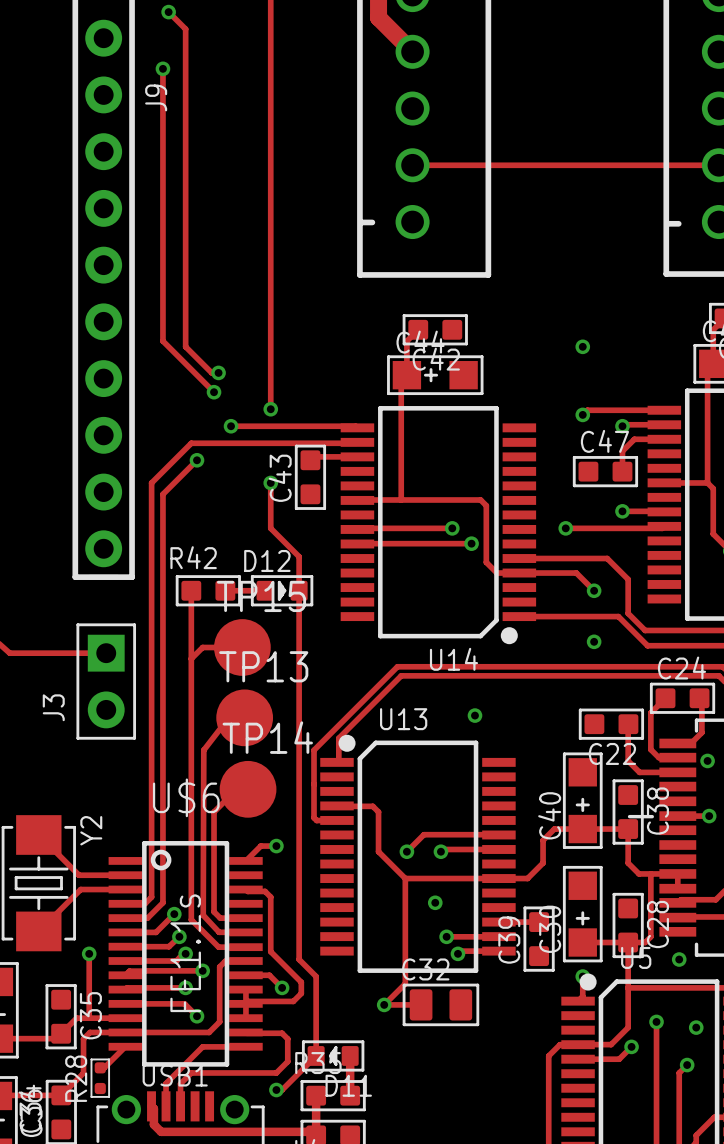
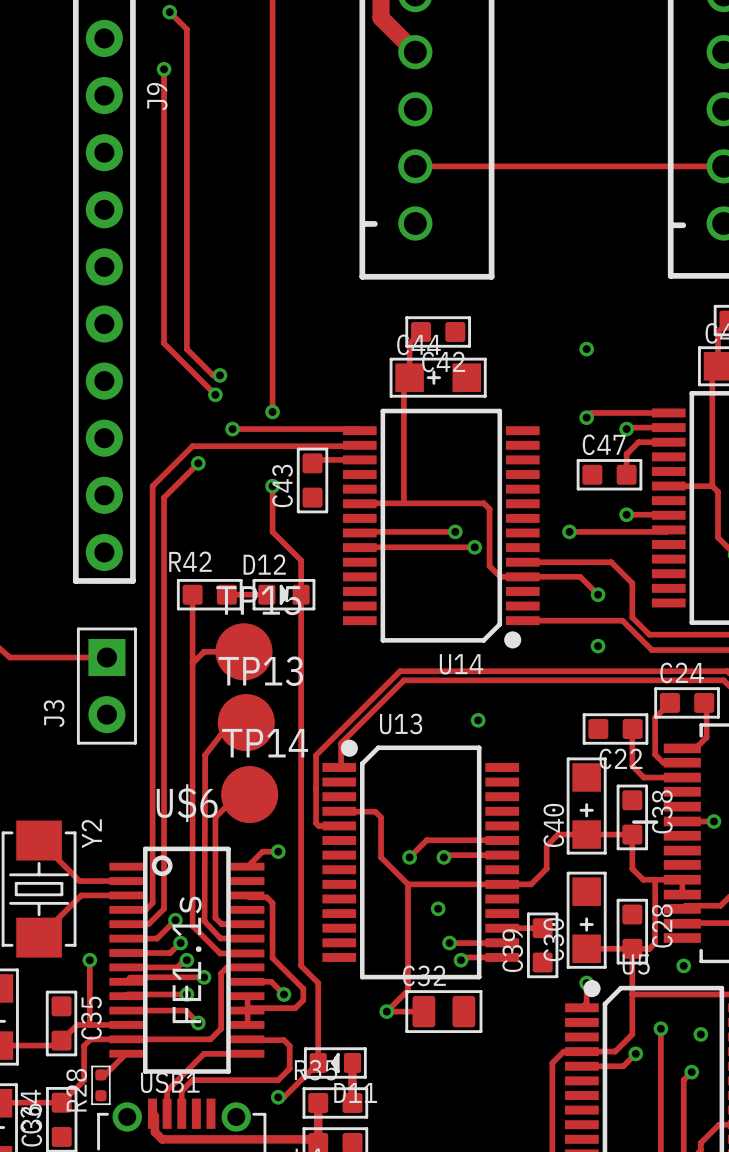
via: (707, 760) -> none

